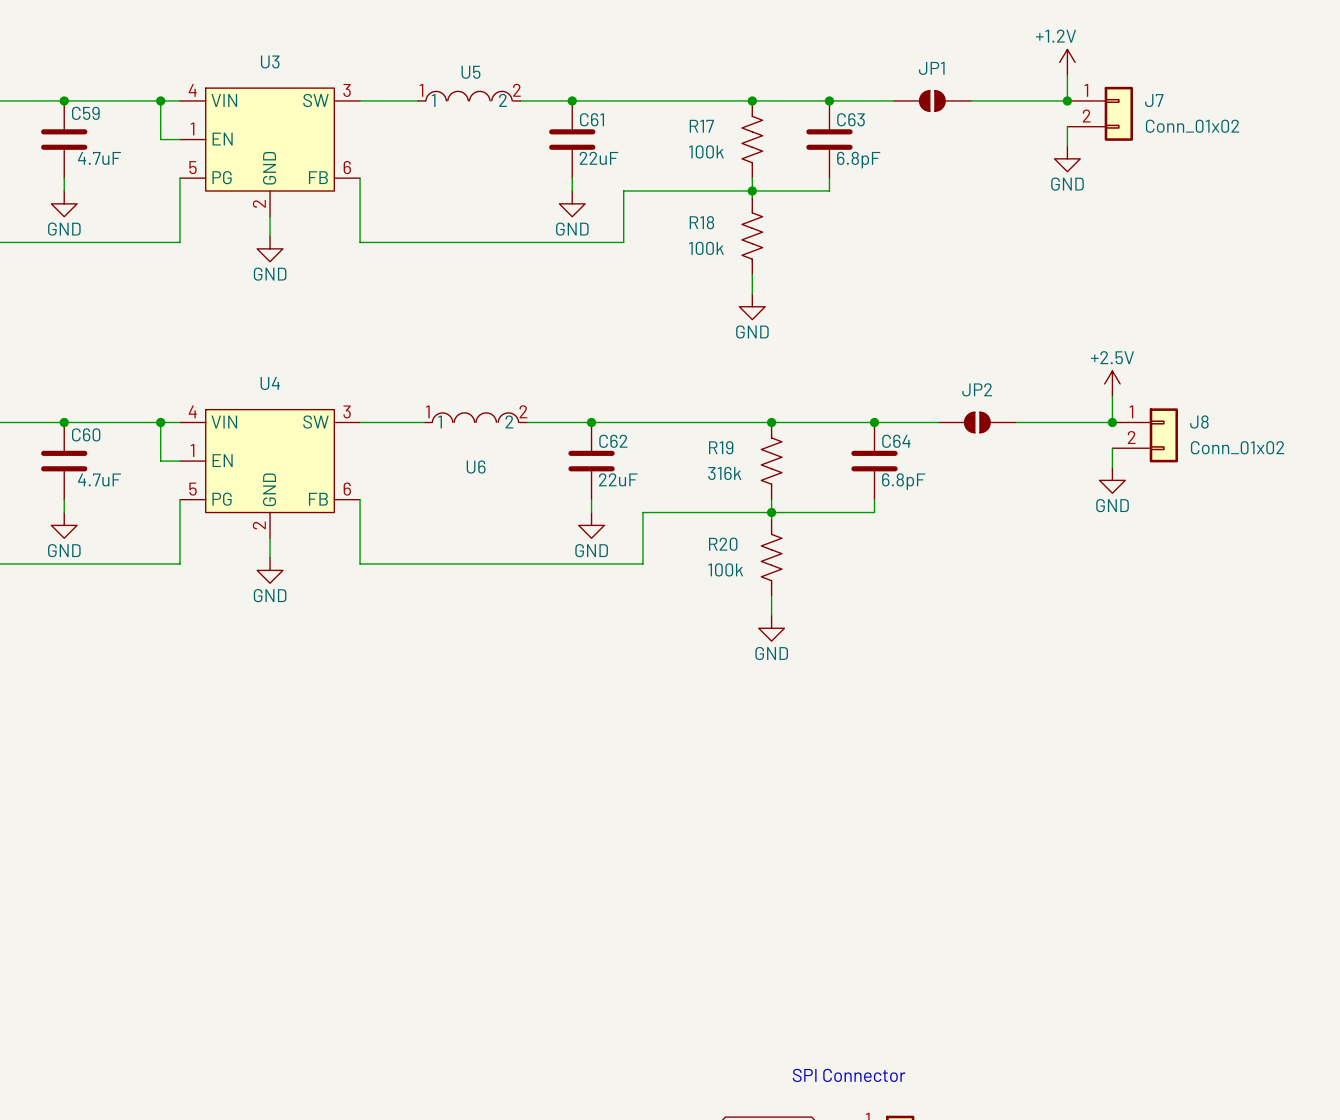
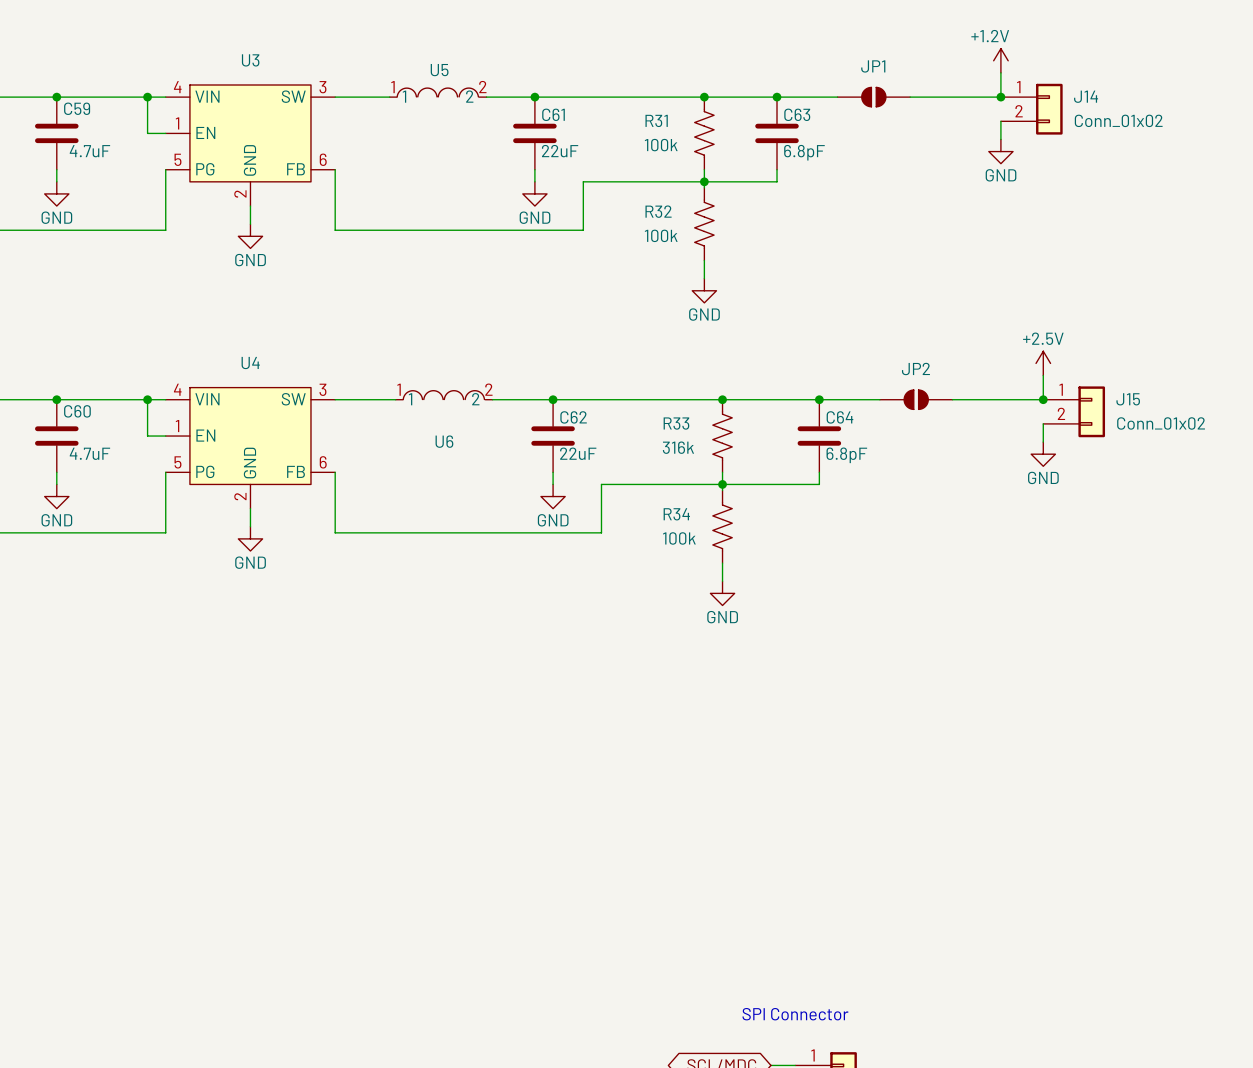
J7 name: J7 (1154, 100) -> J14 (1086, 96)
R17 name: R17 (701, 126) -> R31 (656, 120)
R18 name: R18 (701, 222) -> R32 (658, 211)
J8 name: J8 (1199, 422) -> J15 (1128, 399)
R19 name: R19 (721, 447) -> R33 (676, 423)
R20 name: R20 (723, 544) -> R34 (676, 514)

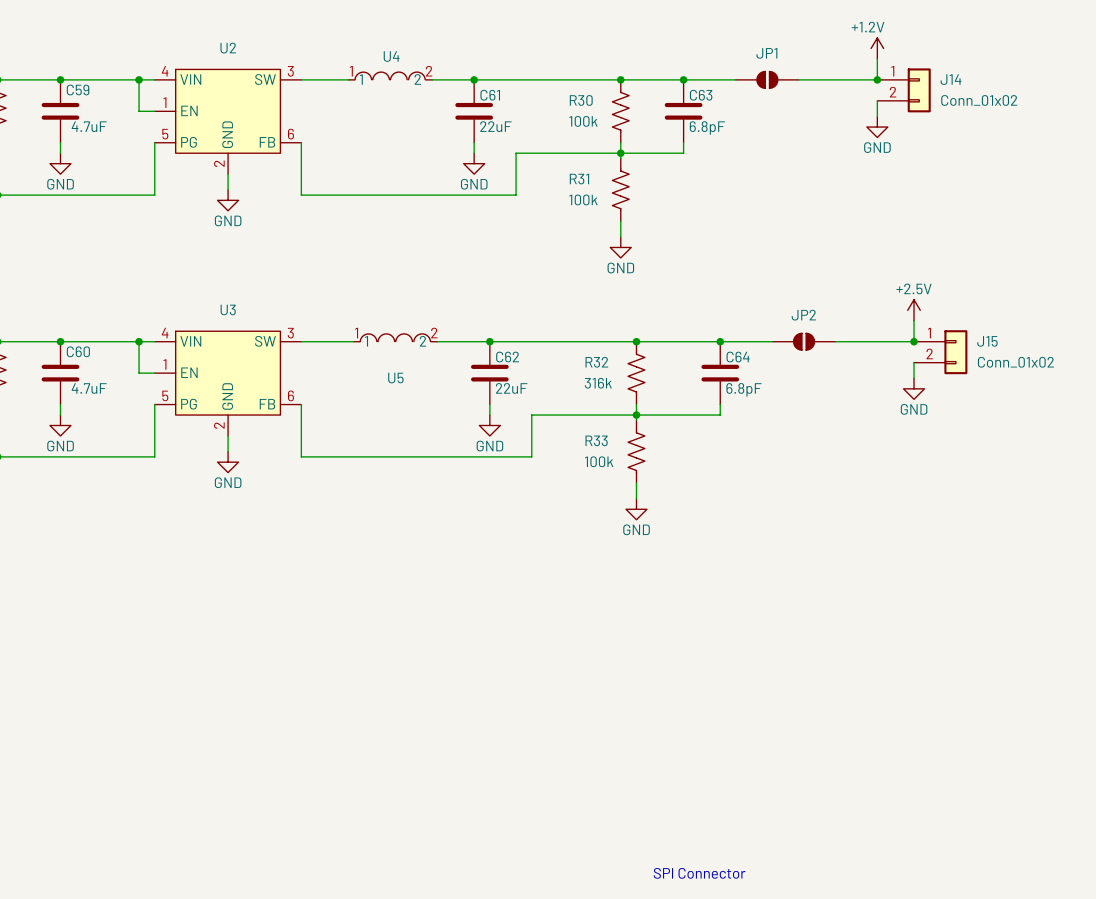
U3 name: U3 (250, 60) -> U2 (228, 48)
U5 name: U5 (439, 70) -> U4 (391, 56)
R31 name: R31 (656, 120) -> R30 (581, 100)
R32 name: R32 (658, 211) -> R31 (579, 179)
U4 name: U4 (250, 363) -> U3 (228, 309)
R33 name: R33 (676, 423) -> R32 (596, 362)
U6 name: U6 (444, 441) -> U5 (395, 378)
R34 name: R34 (676, 514) -> R33 (596, 440)

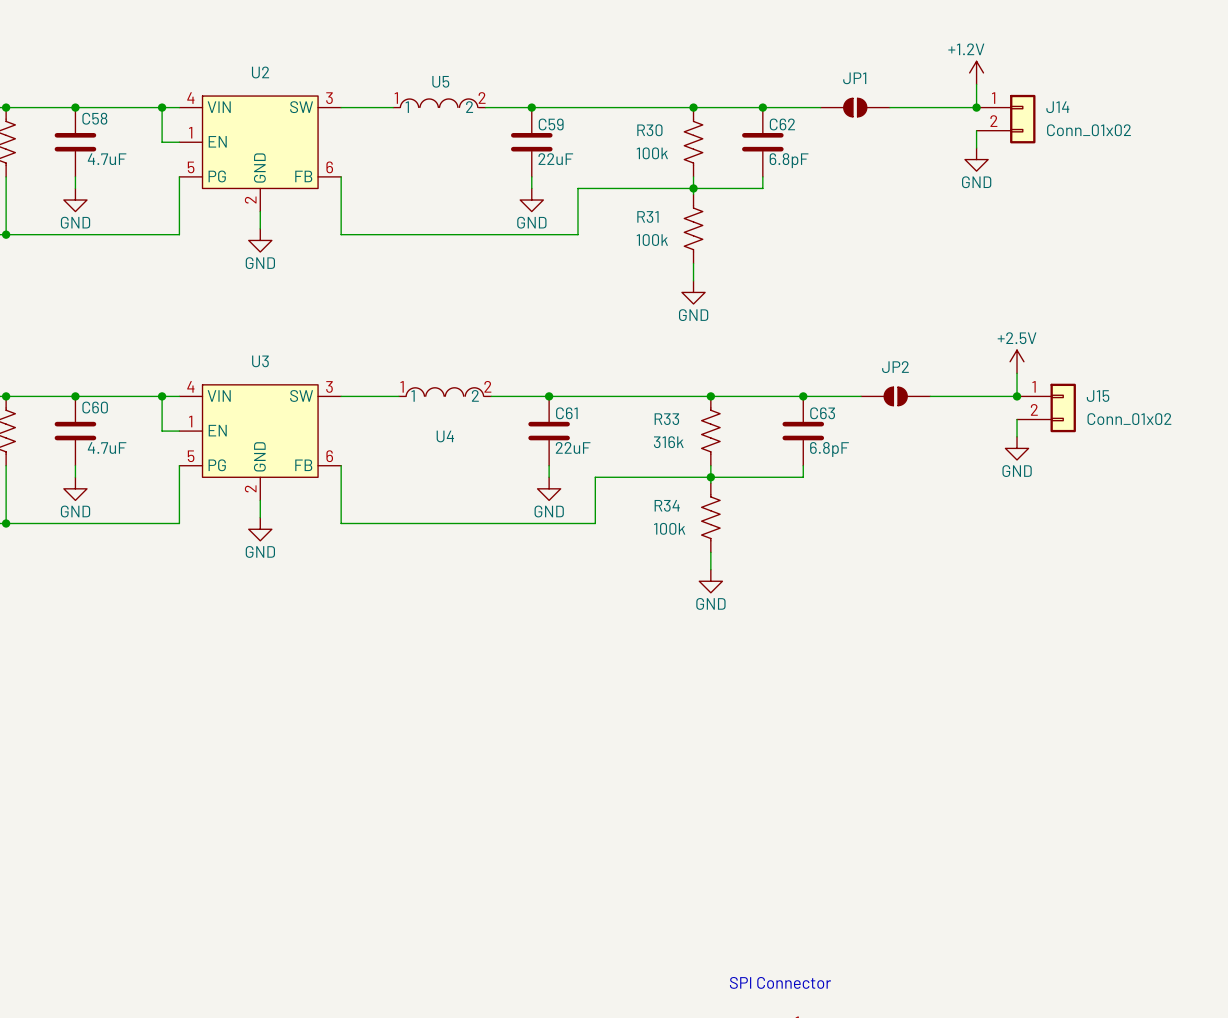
U4 name: U4 (391, 56) -> U5 (440, 81)
C59 name: C59 (78, 89) -> C58 (94, 118)
C61 name: C61 (490, 95) -> C59 (551, 124)
C63 name: C63 (701, 95) -> C62 (782, 124)
C62 name: C62 (507, 357) -> C61 (566, 413)
C64 name: C64 (738, 357) -> C63 (822, 413)
R32 name: R32 (596, 362) -> R33 (666, 419)
U5 name: U5 (395, 378) -> U4 (445, 436)
R33 name: R33 (596, 440) -> R34 (667, 505)

